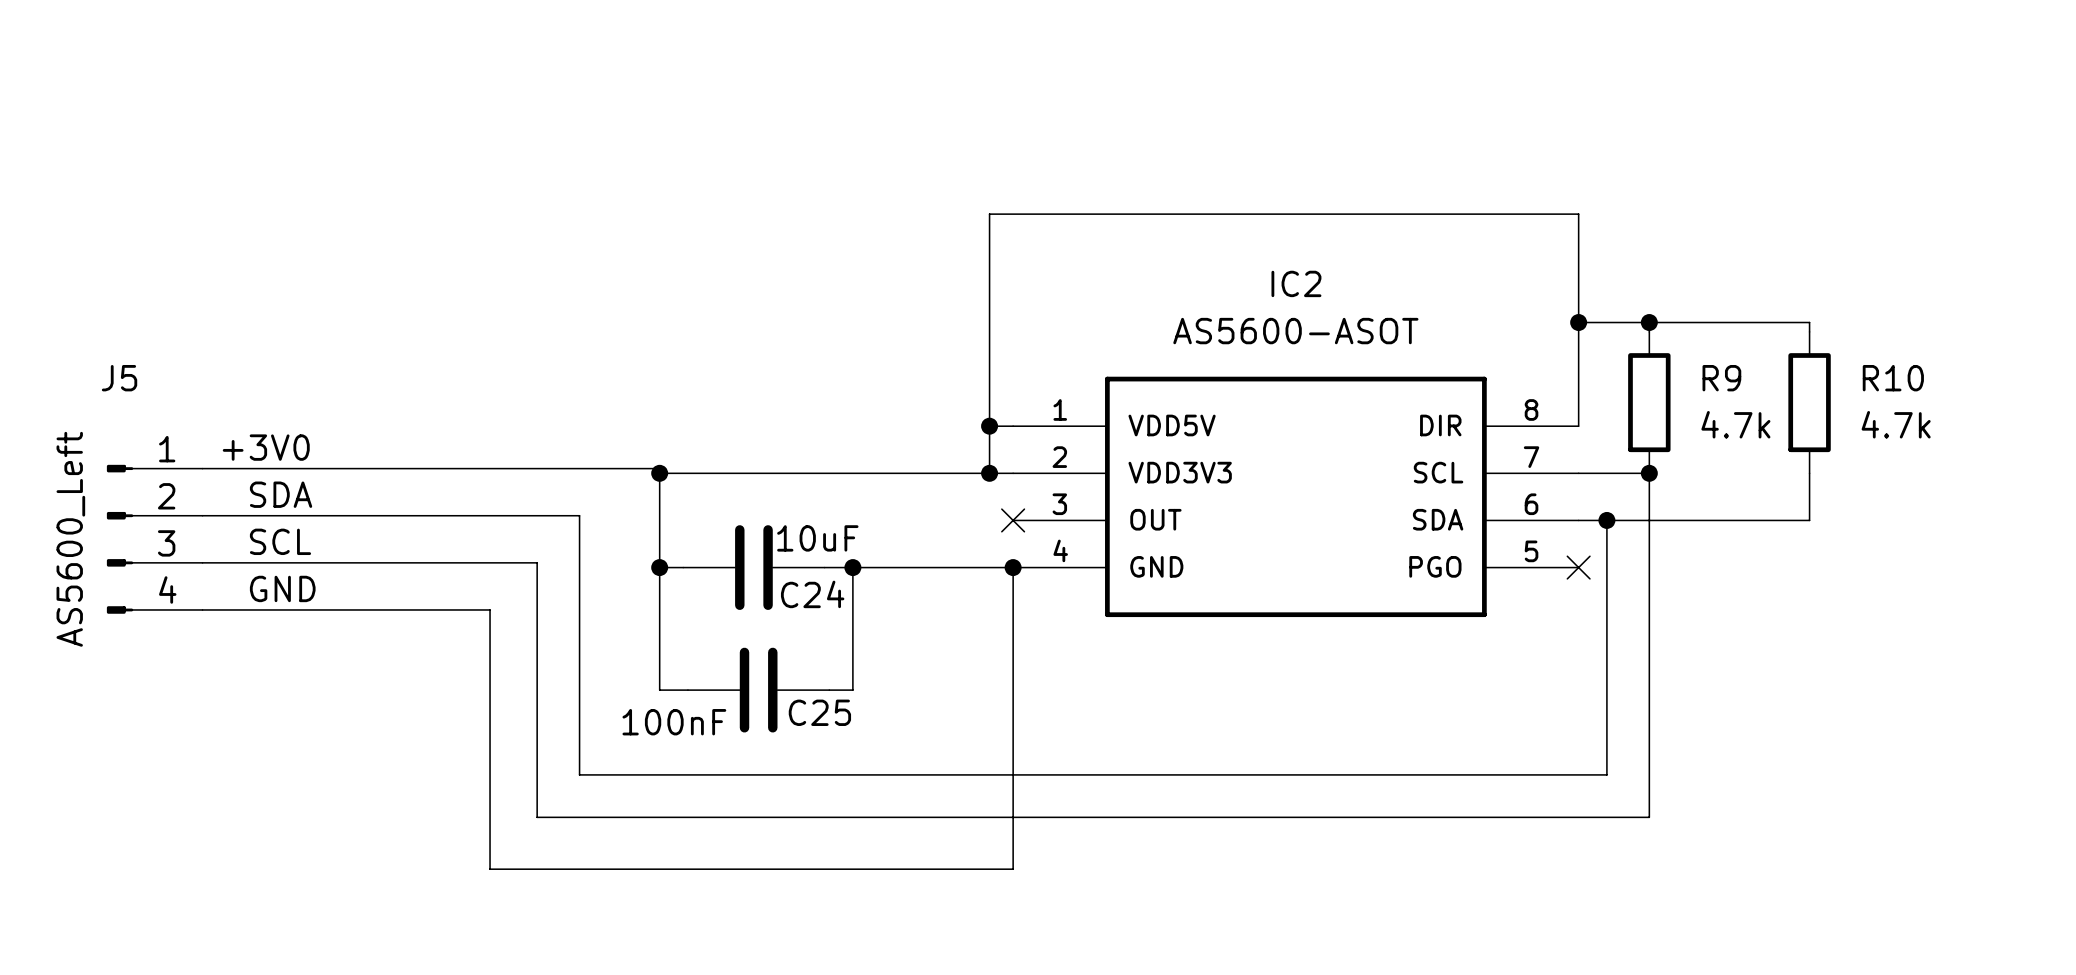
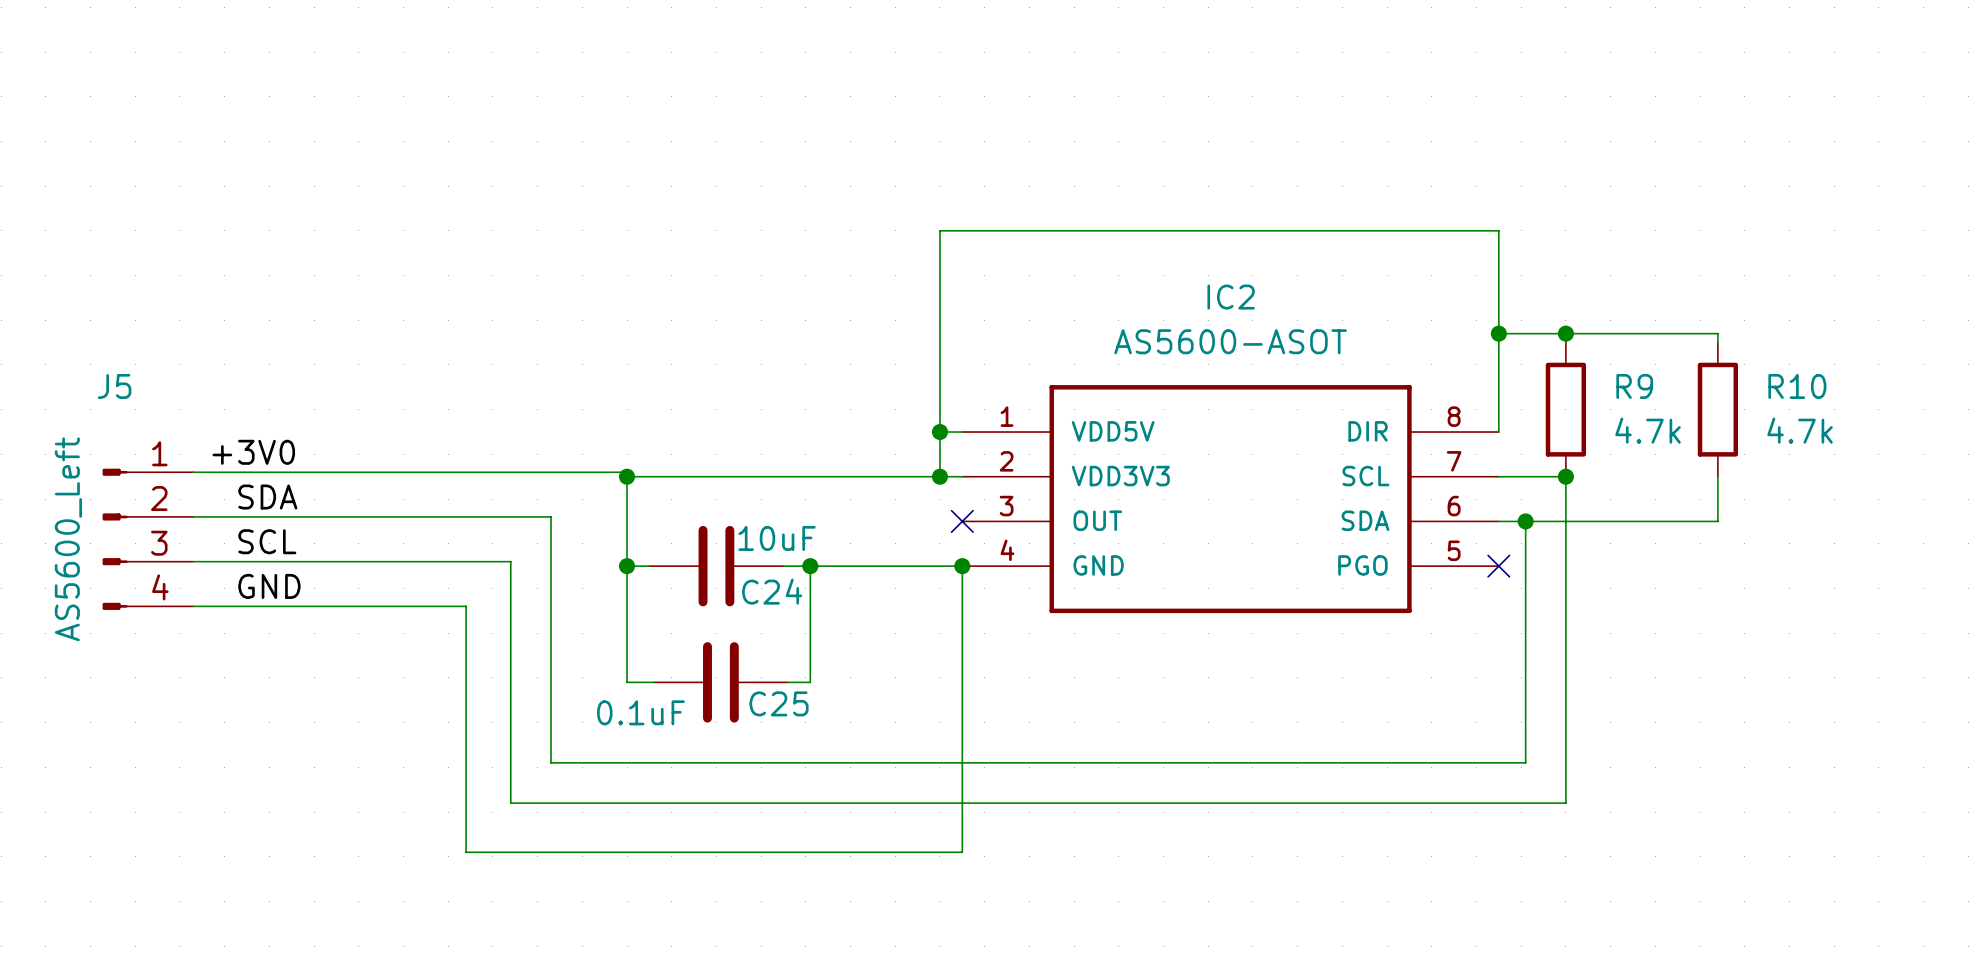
C25 value: 100nF (674, 722) -> 0.1uF (640, 712)

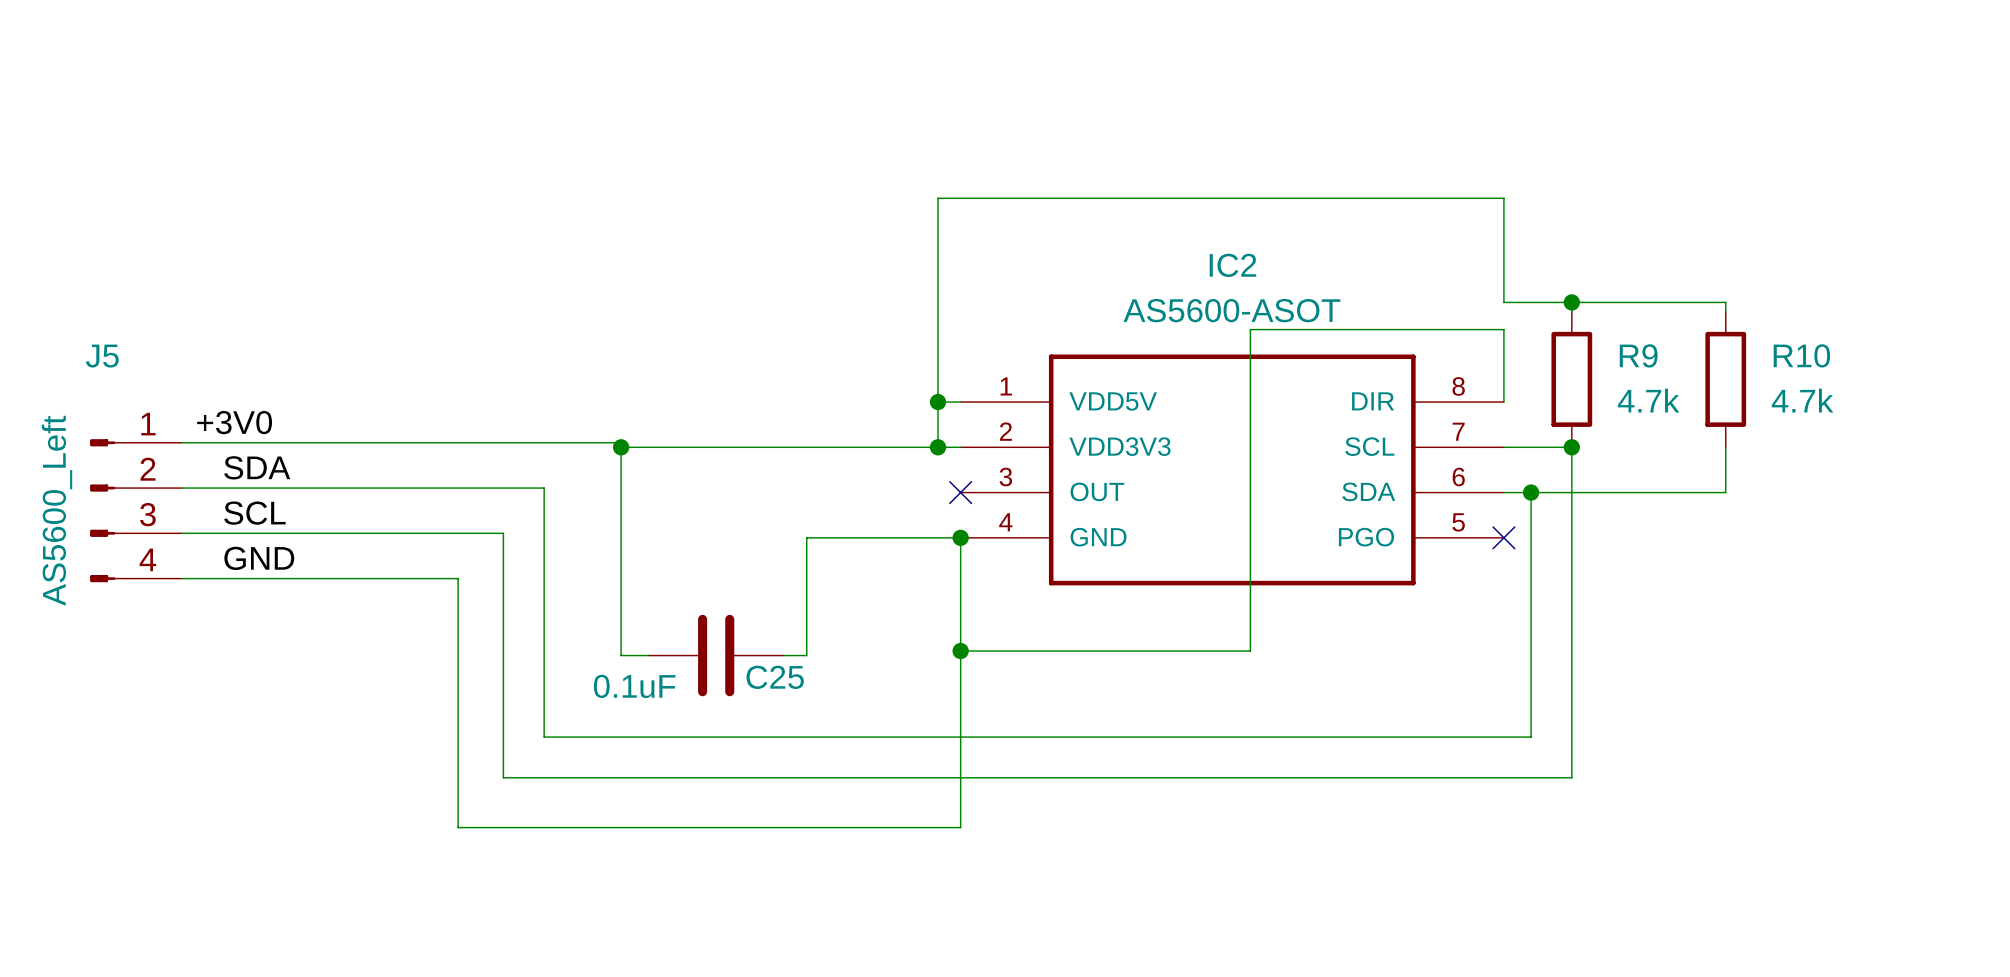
wire: (1498, 333) (1498, 360) -> (960, 651) (1250, 651) (1250, 329) (1503, 329)
junction: (1498, 333) -> none
wire: (627, 566) (649, 566) -> none
junction: (627, 566) -> none
C24: 10uF (716, 566) -> none
wire: (783, 566) (810, 566) -> none
junction: (810, 566) -> none
junction: none -> (960, 651)

